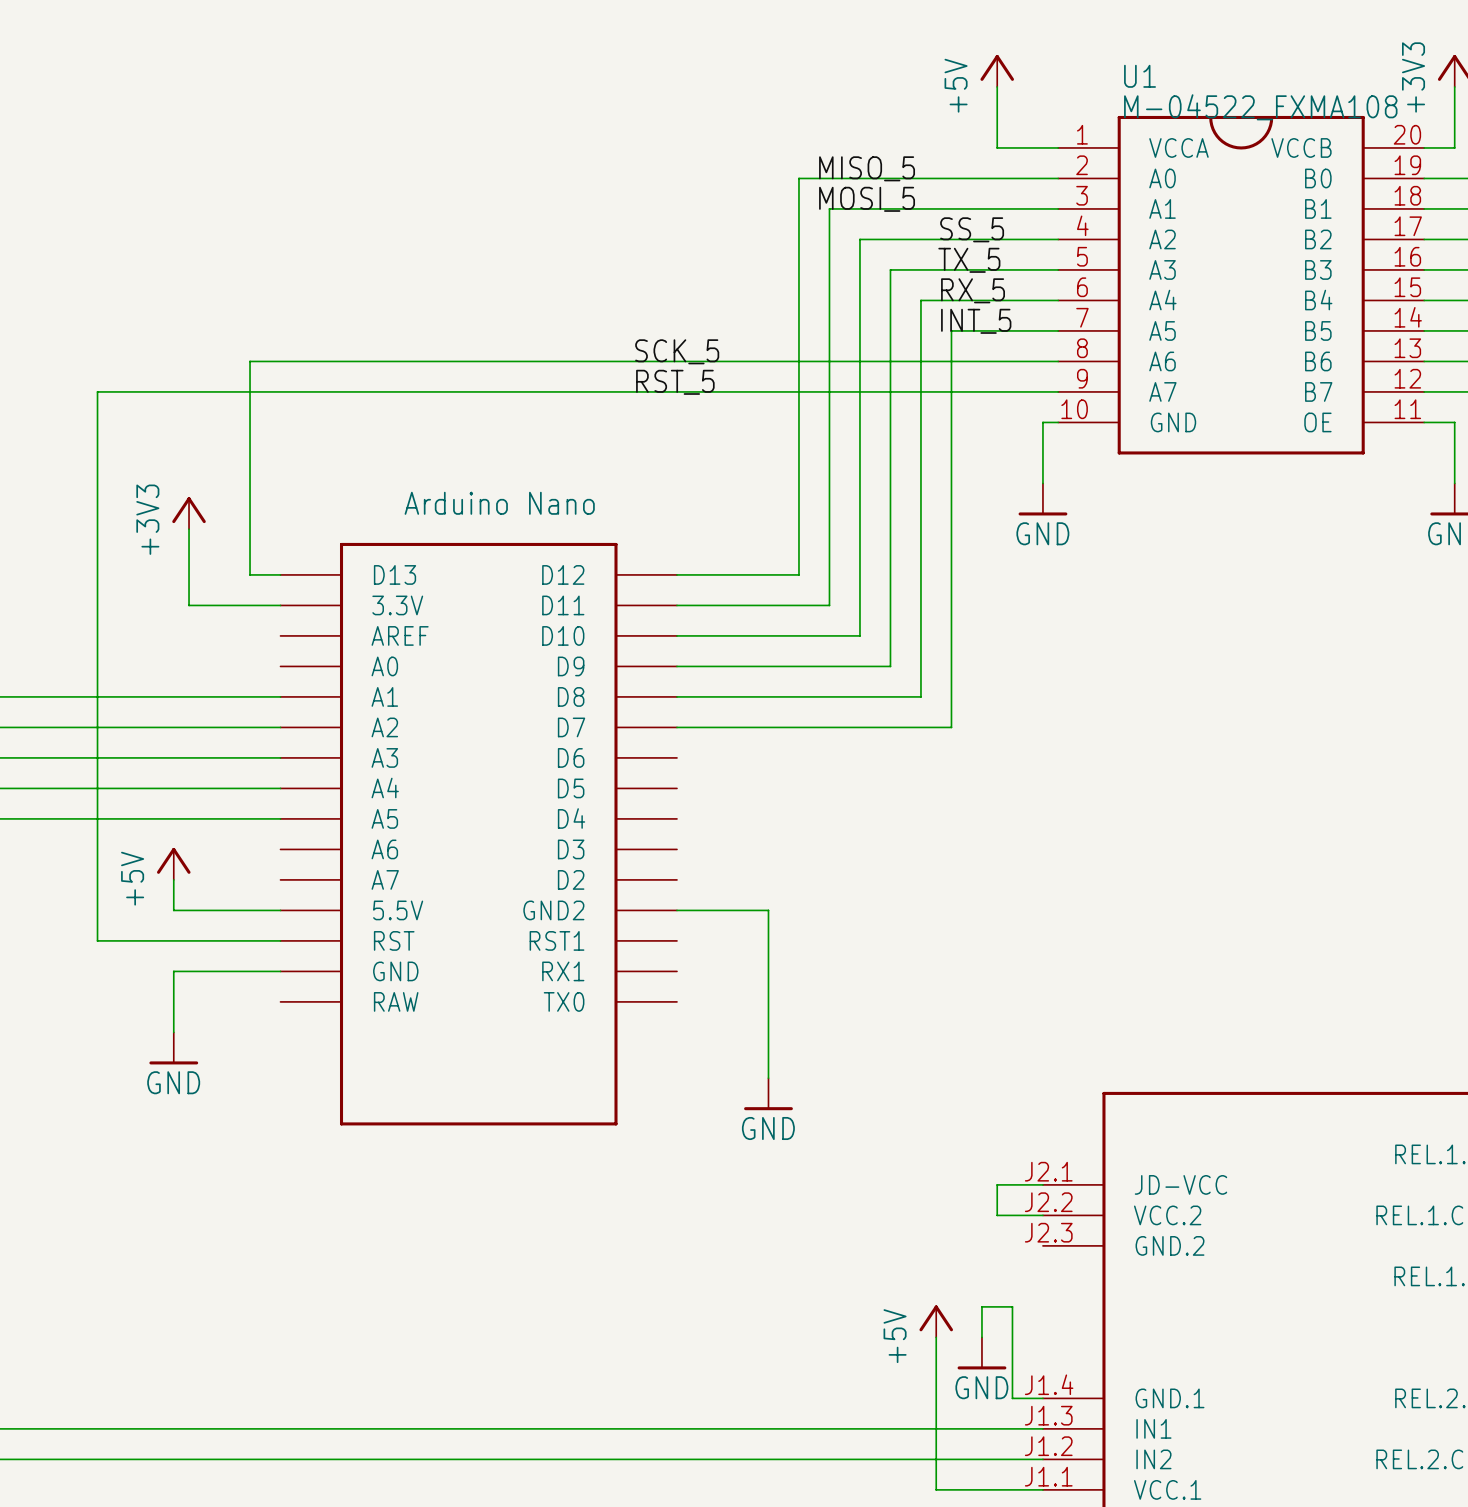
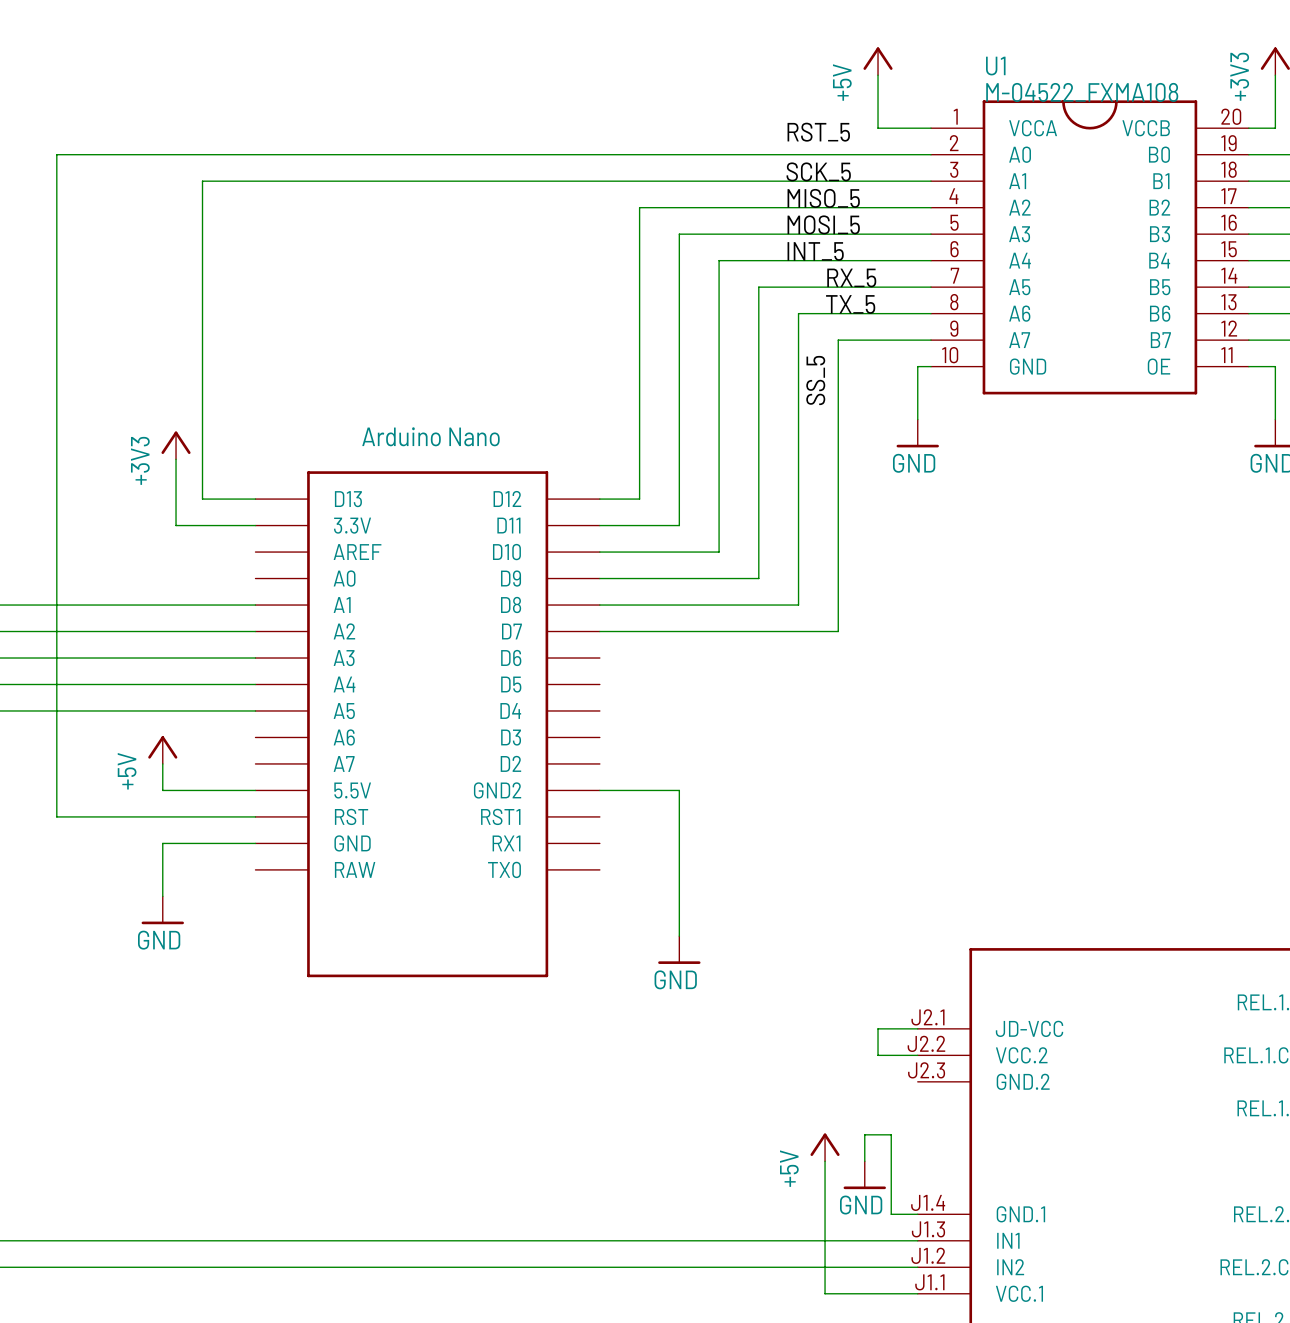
label: none -> RST_5 (818, 132)
label position: MISO_5 (867, 168) -> MISO_5 (823, 198)
wire: (798, 178) (798, 574) (722, 574) -> (758, 207) (639, 207) (639, 499)
label position: MOSI_5 (867, 199) -> MOSI_5 (823, 224)
label: none -> SCK_5 (818, 171)
wire: (829, 208) (829, 605) (768, 605) -> (785, 234) (679, 234) (679, 525)
label rotation: 0° (972, 229) -> 90° counterclockwise (815, 380)
label position: SS_5 (972, 229) -> SS_5 (815, 380)
wire: (859, 239) (859, 330) -> (838, 287) (758, 287)
label position: TX_5 (969, 260) -> TX_5 (850, 304)
wire: (890, 269) (890, 666) (859, 666) -> none
label: none -> INT_5 (815, 251)
label: RX_5 (973, 290) -> none
wire: (920, 300) (920, 696) (905, 696) -> (798, 313) (798, 605)
wire: none -> (811, 260) (719, 260) (719, 552)
label: INT_5 (976, 321) -> RX_5 (851, 277)
wire: (951, 330) (951, 391) (97, 391) (97, 940) -> (705, 154) (56, 154) (56, 816) (96, 816)
label: SCK_5 (677, 351) -> none
wire: (905, 361) (250, 361) (250, 574) -> (732, 181) (202, 181) (202, 499) (228, 499)
label: RST_5 (675, 382) -> none
wire: (814, 635) (859, 635) -> (758, 578) (758, 552)

